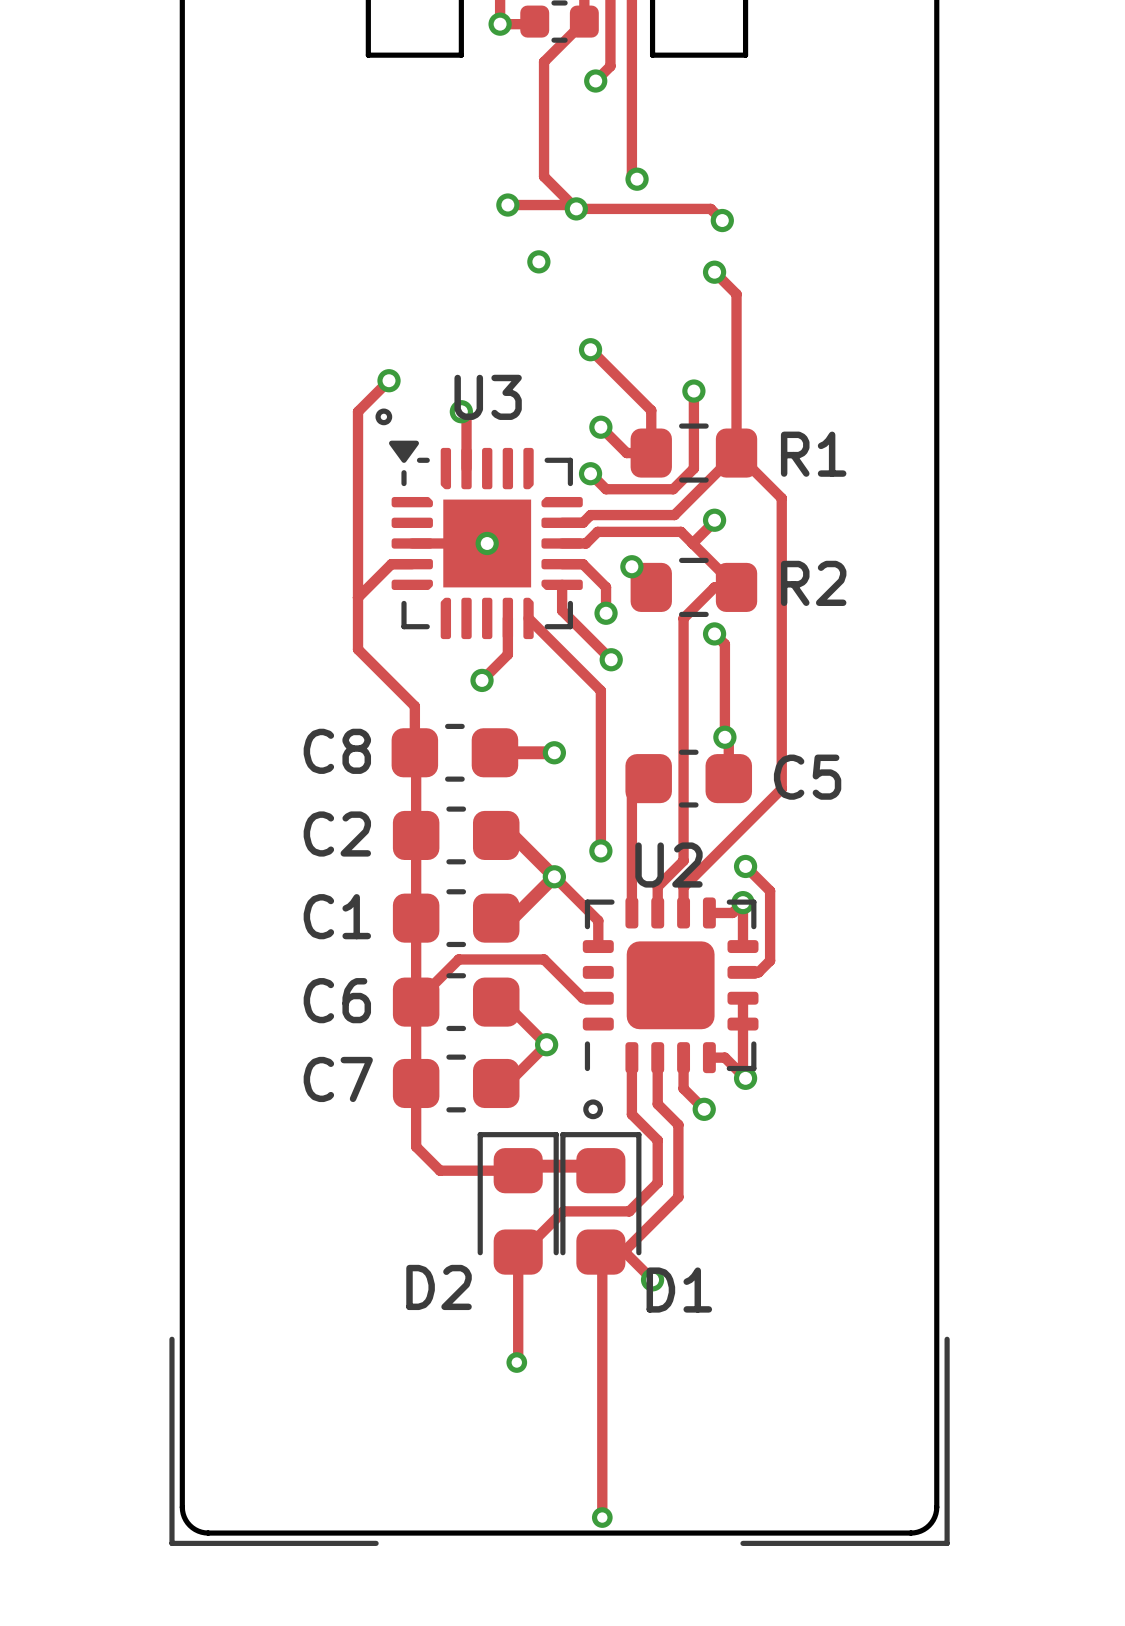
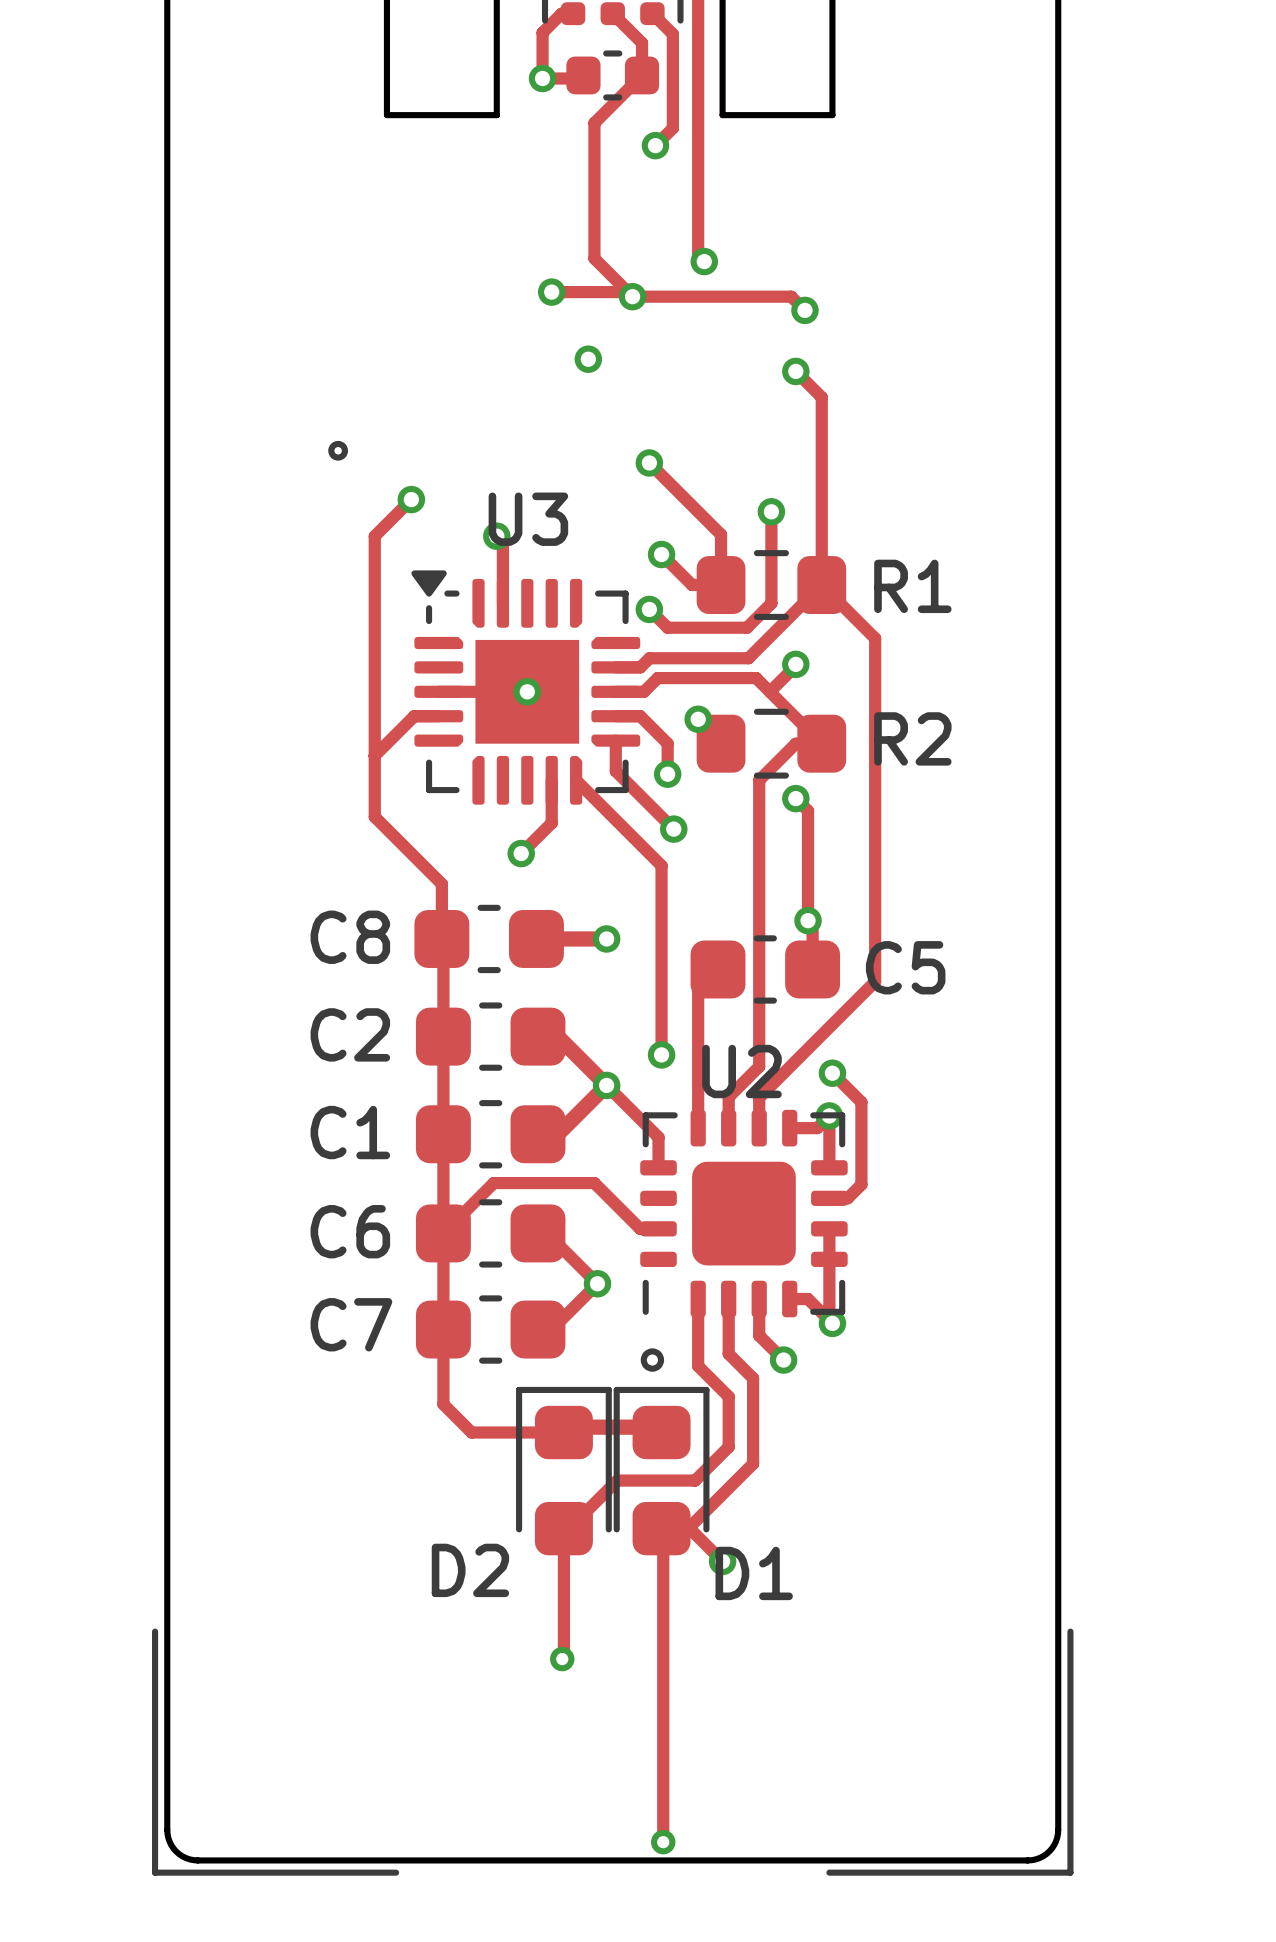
drawing position: (383, 416) -> (338, 450)

